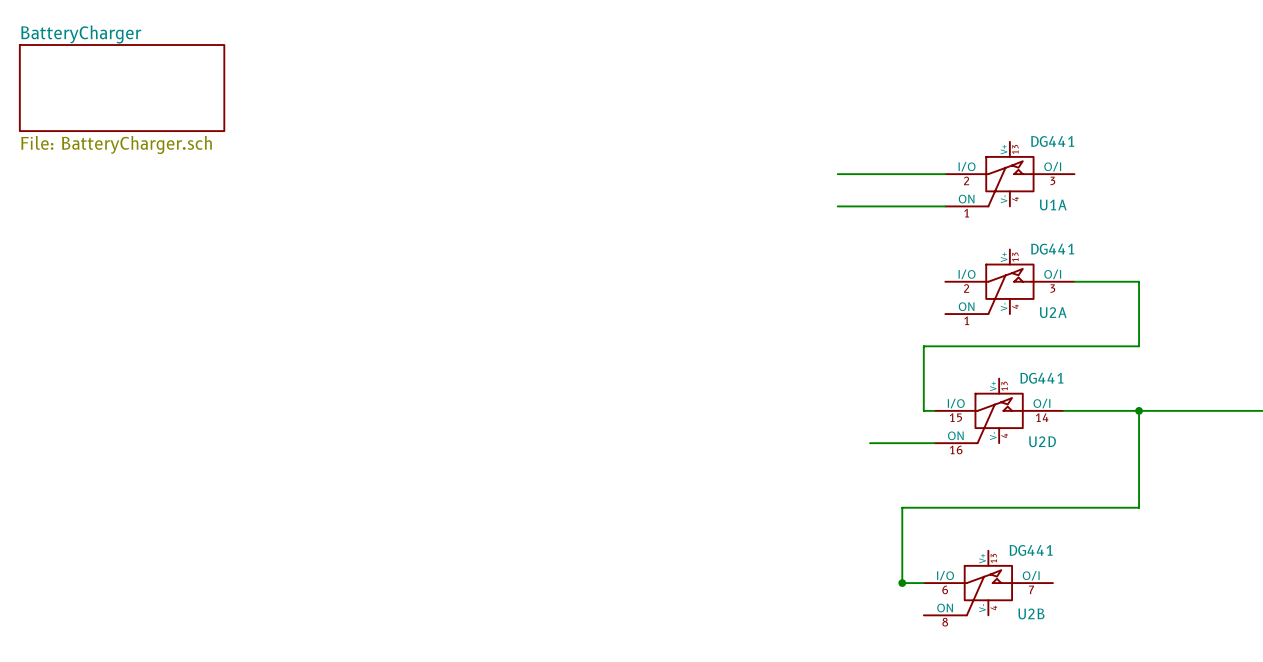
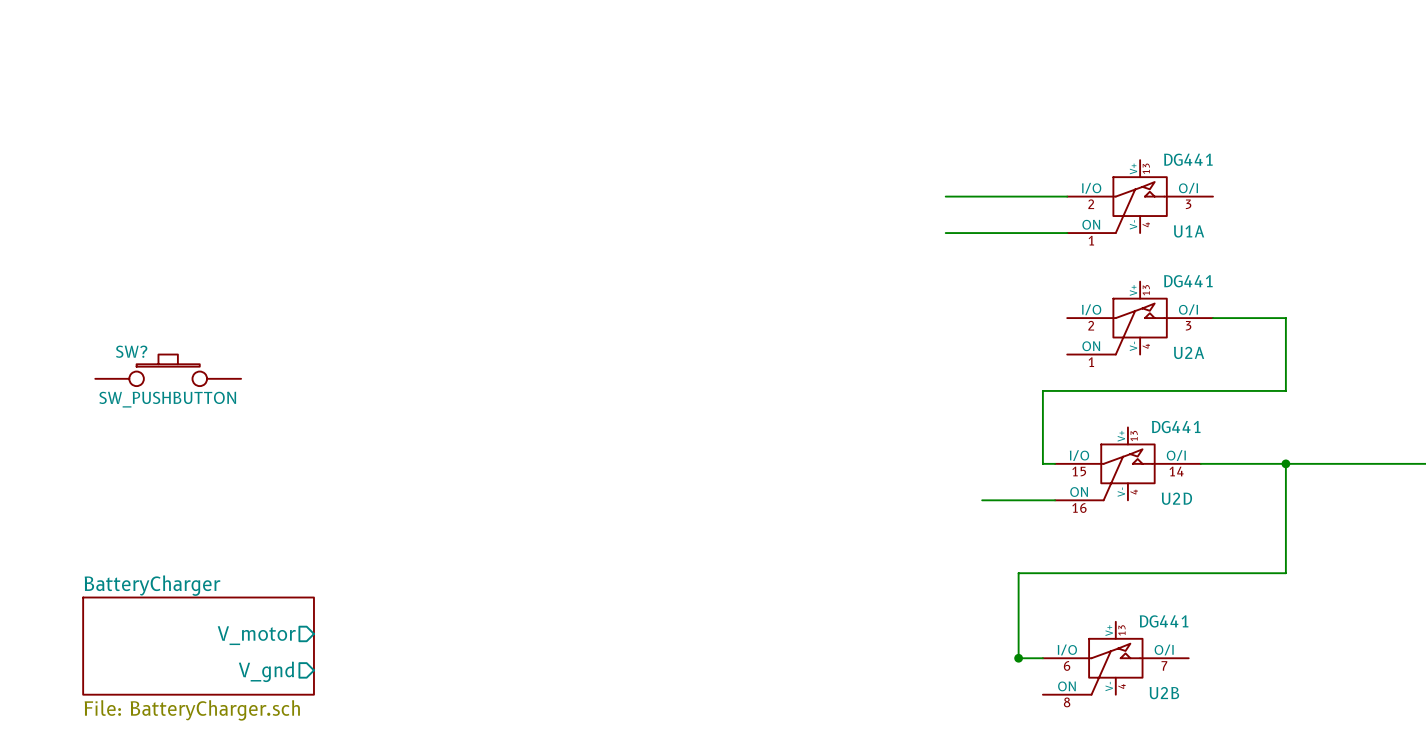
sheet BatteryCharger: File: BatteryCharger.sch (122, 88) -> none
SW?: none -> SW_PUSHBUTTON (168, 370)
sheet pin: none -> V_motor (256, 635)
sheet BatteryCharger: none -> File: BatteryCharger.sch (198, 646)
sheet pin: none -> V_gnd (266, 671)

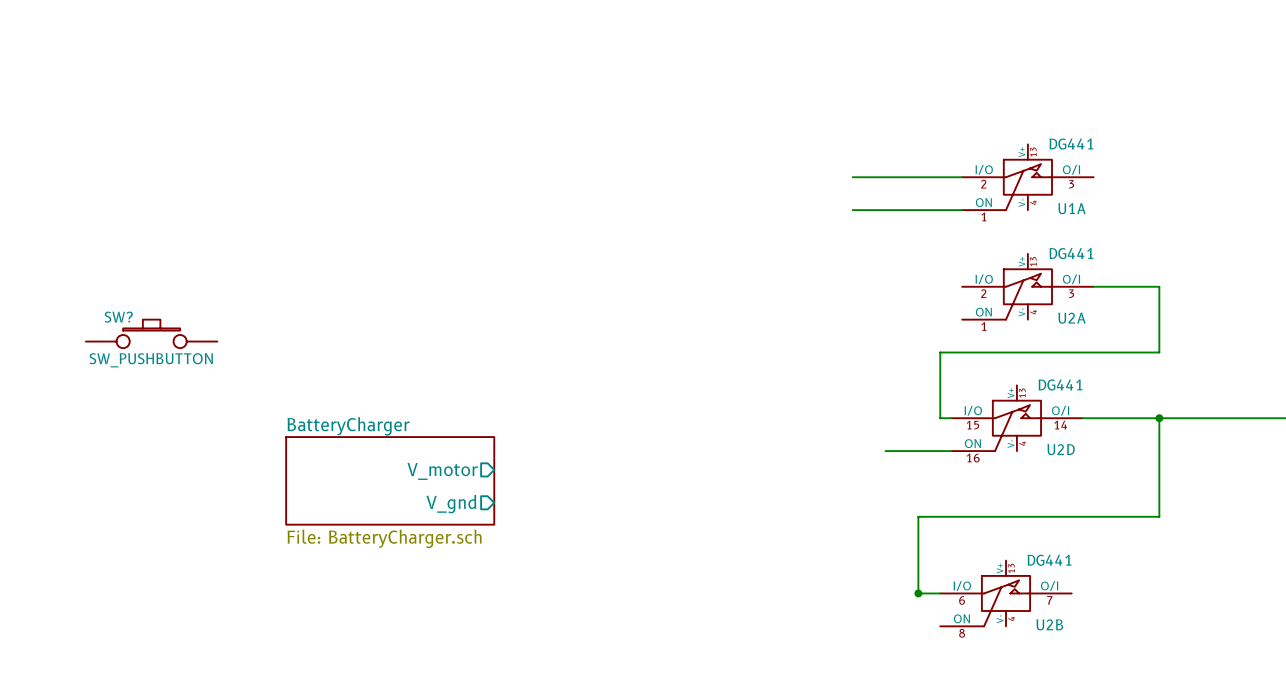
sheet pin: none -> V_motor (442, 471)
sheet BatteryCharger: none -> File: BatteryCharger.sch (390, 480)
sheet pin: none -> V_gnd (451, 504)
sheet pin: V_motor (256, 635) -> none
sheet BatteryCharger: File: BatteryCharger.sch (198, 646) -> none
sheet pin: V_gnd (266, 671) -> none

